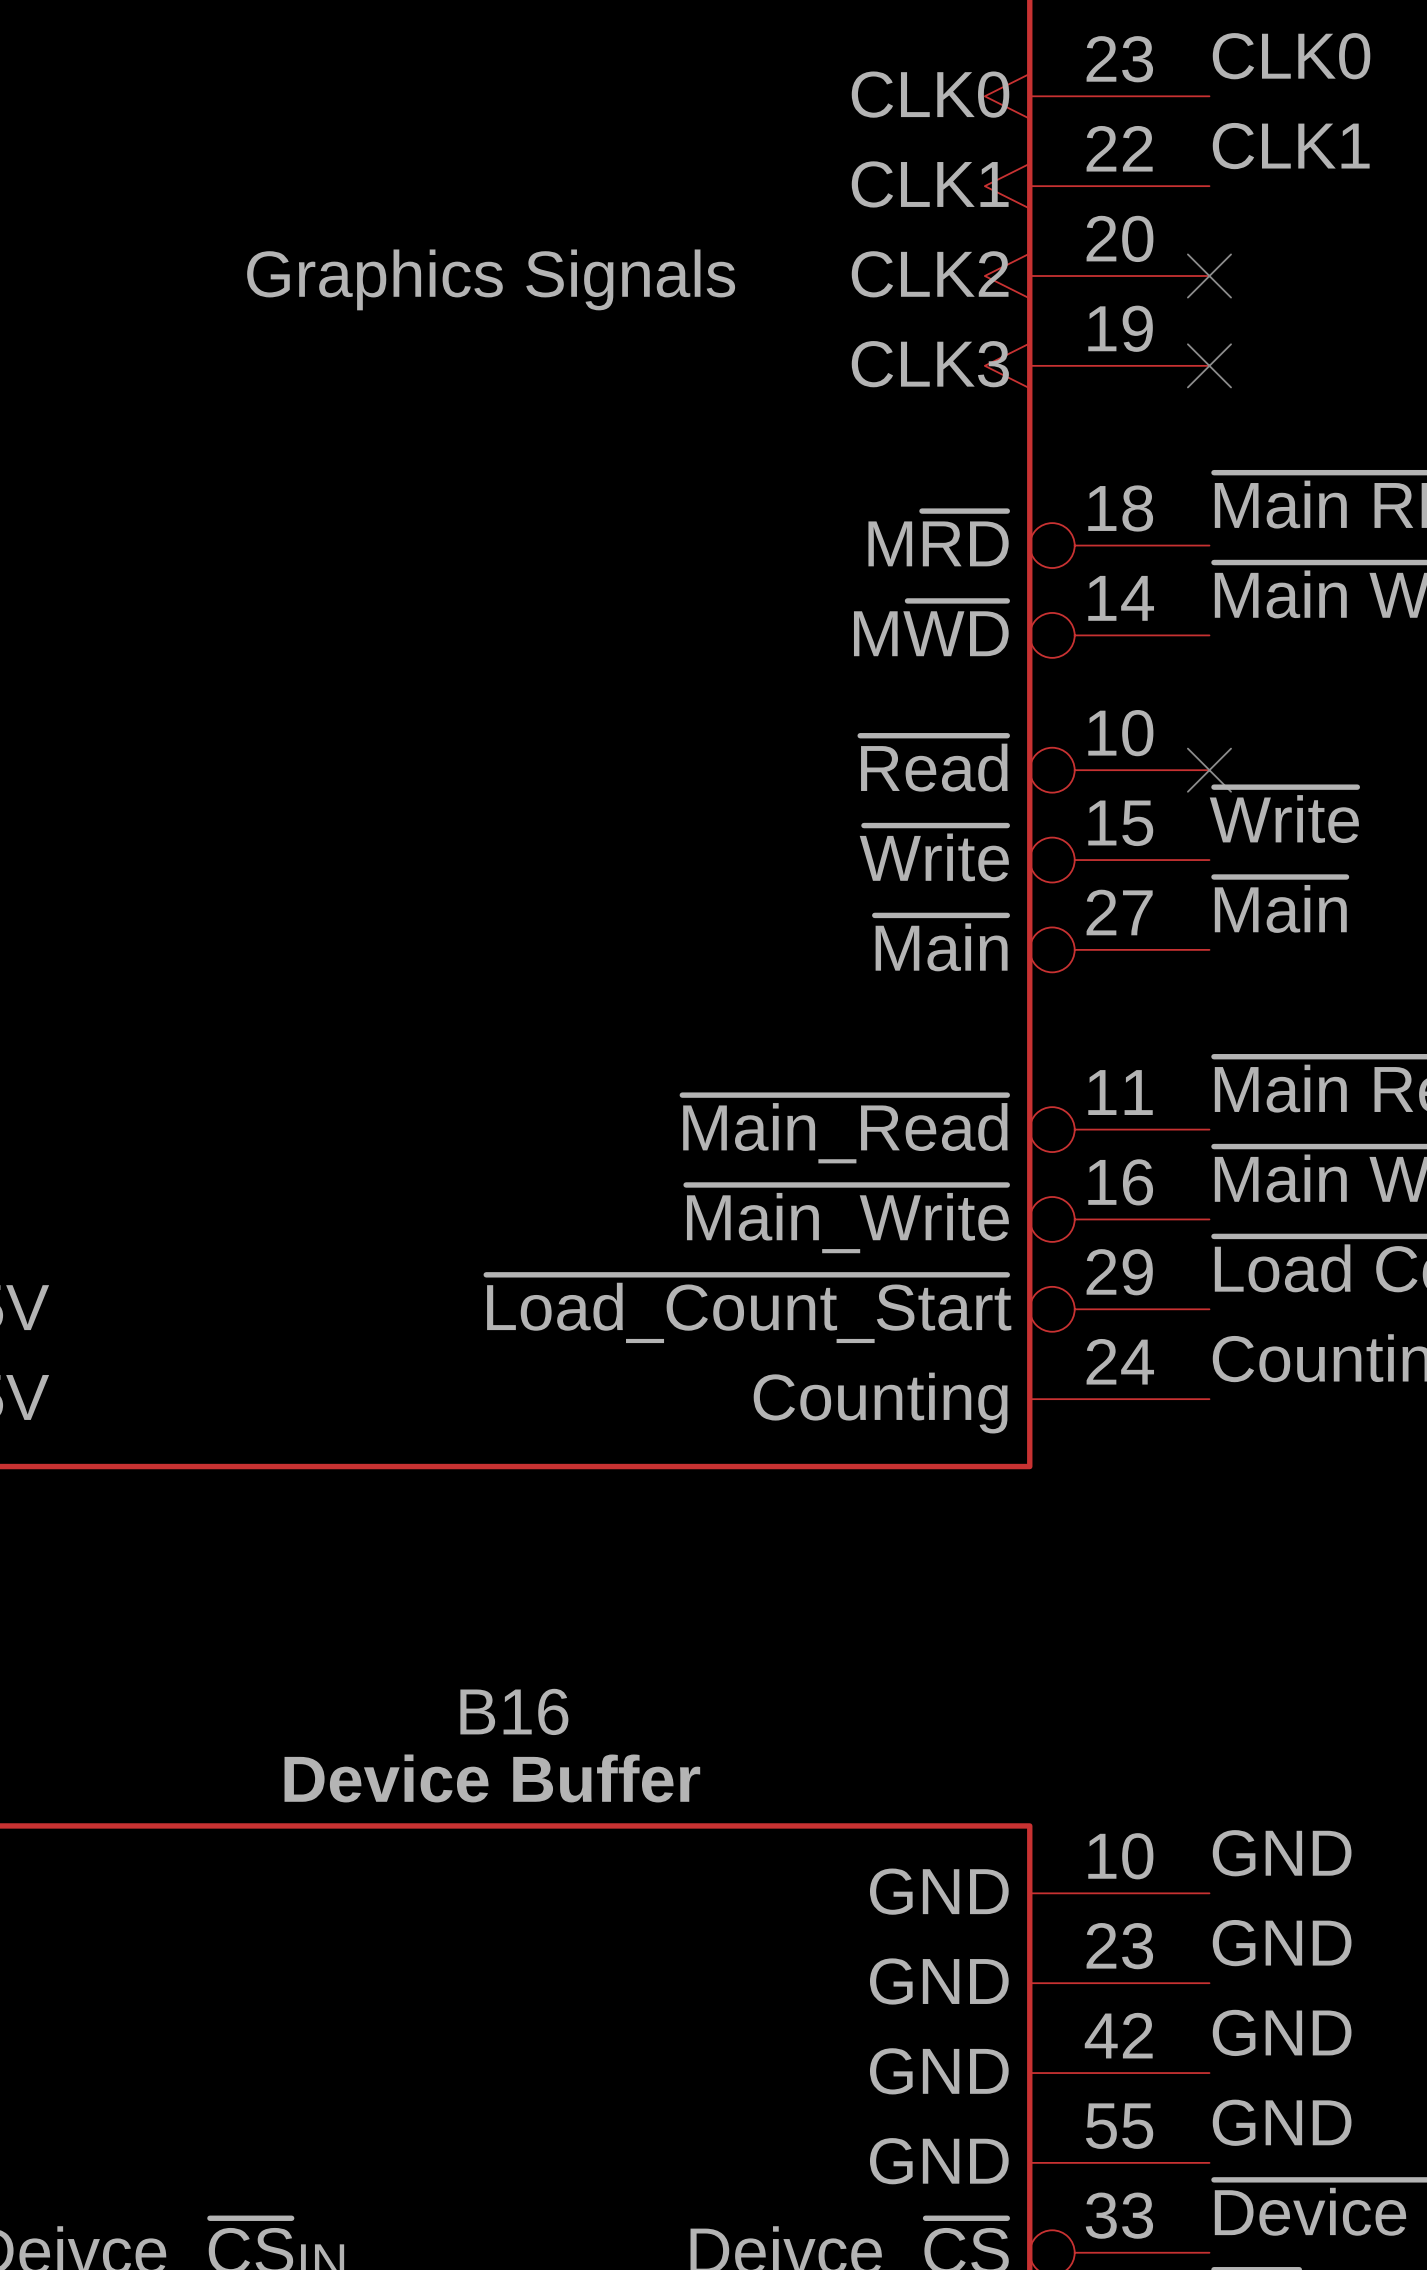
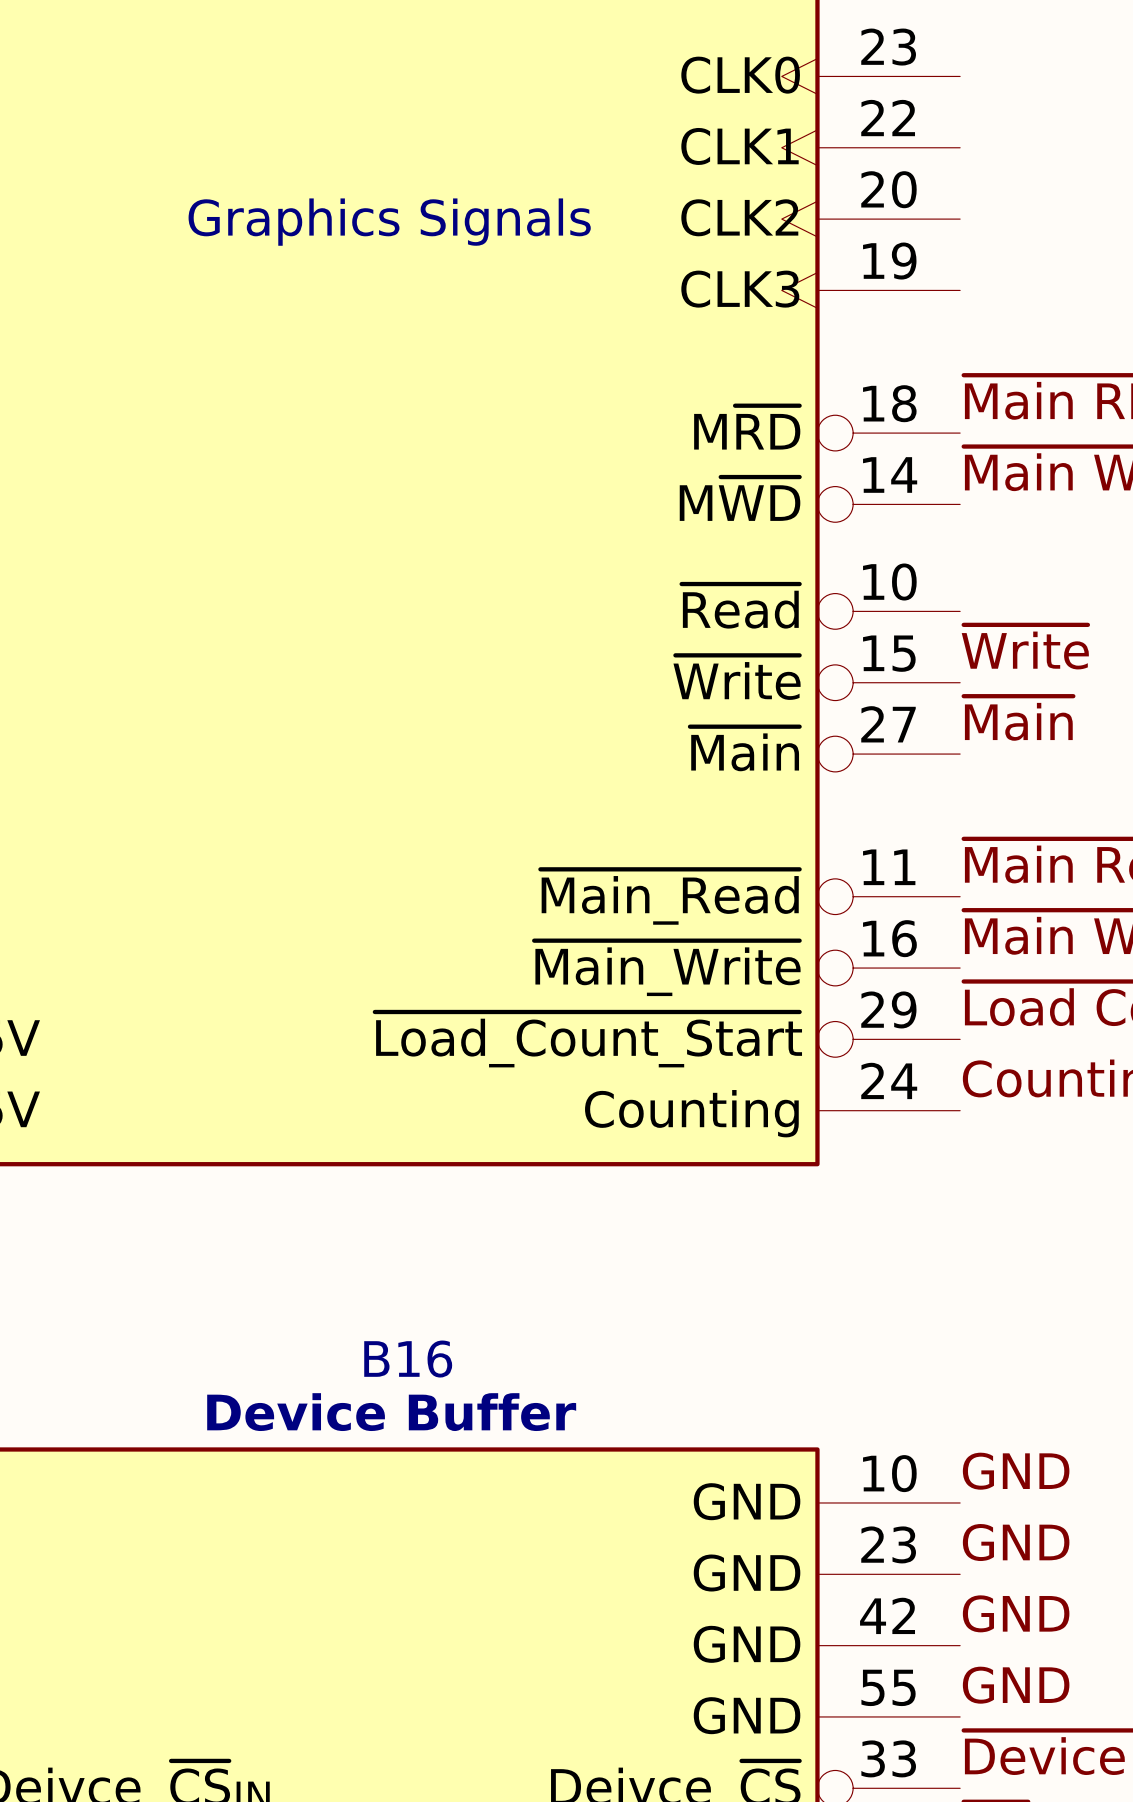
label: CLK0 (1291, 56) -> none
label: CLK1 (1291, 146) -> none
no-connect mark: (1209, 276) -> none
no-connect mark: (1209, 365) -> none
no-connect mark: (1209, 770) -> none

